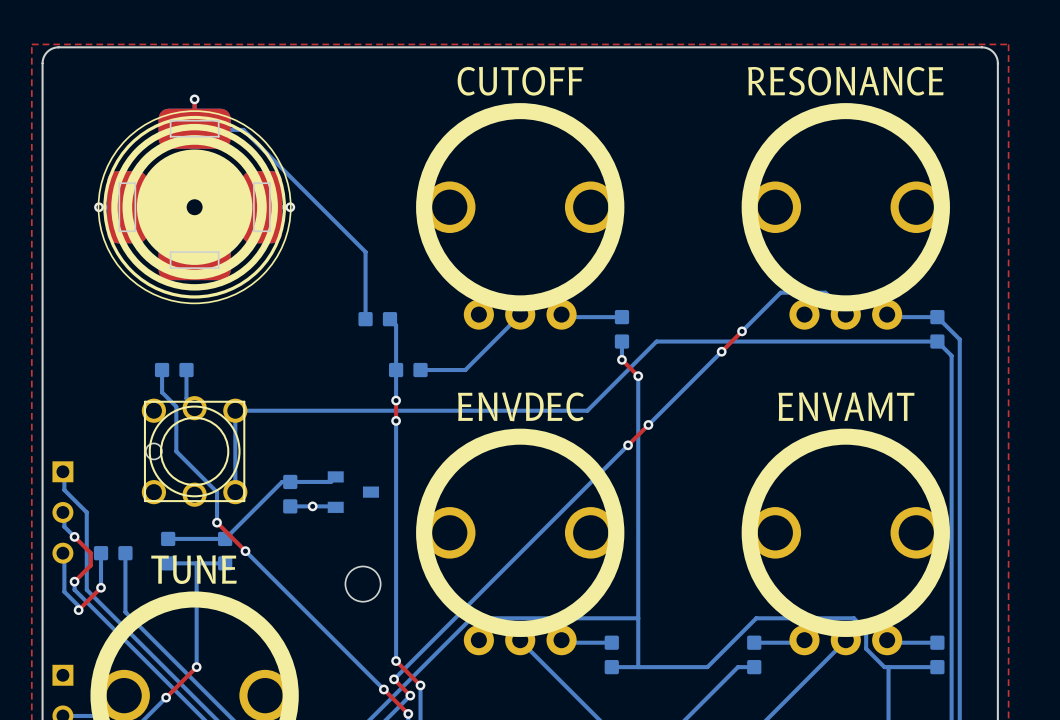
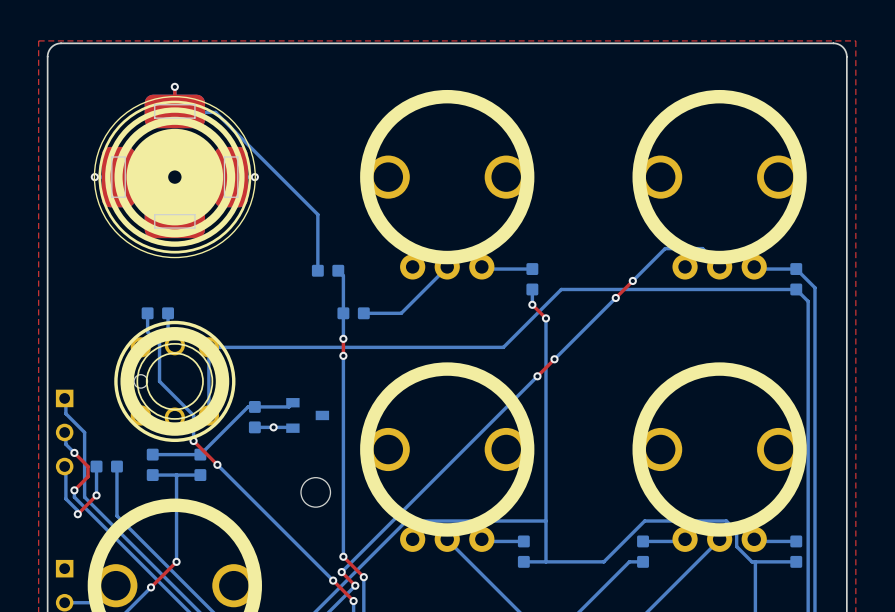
CUTOFF name: CUTOFF (520, 81) -> none
RESONANCE name: RESONANCE (845, 81) -> none
part footprint: [141, 396, 248, 507] -> [114, 320, 236, 443]
ENVDEC name: ENVDEC (520, 406) -> none
ENVAMT name: ENVAMT (846, 406) -> none
TUNE name: TUNE (194, 569) -> none

